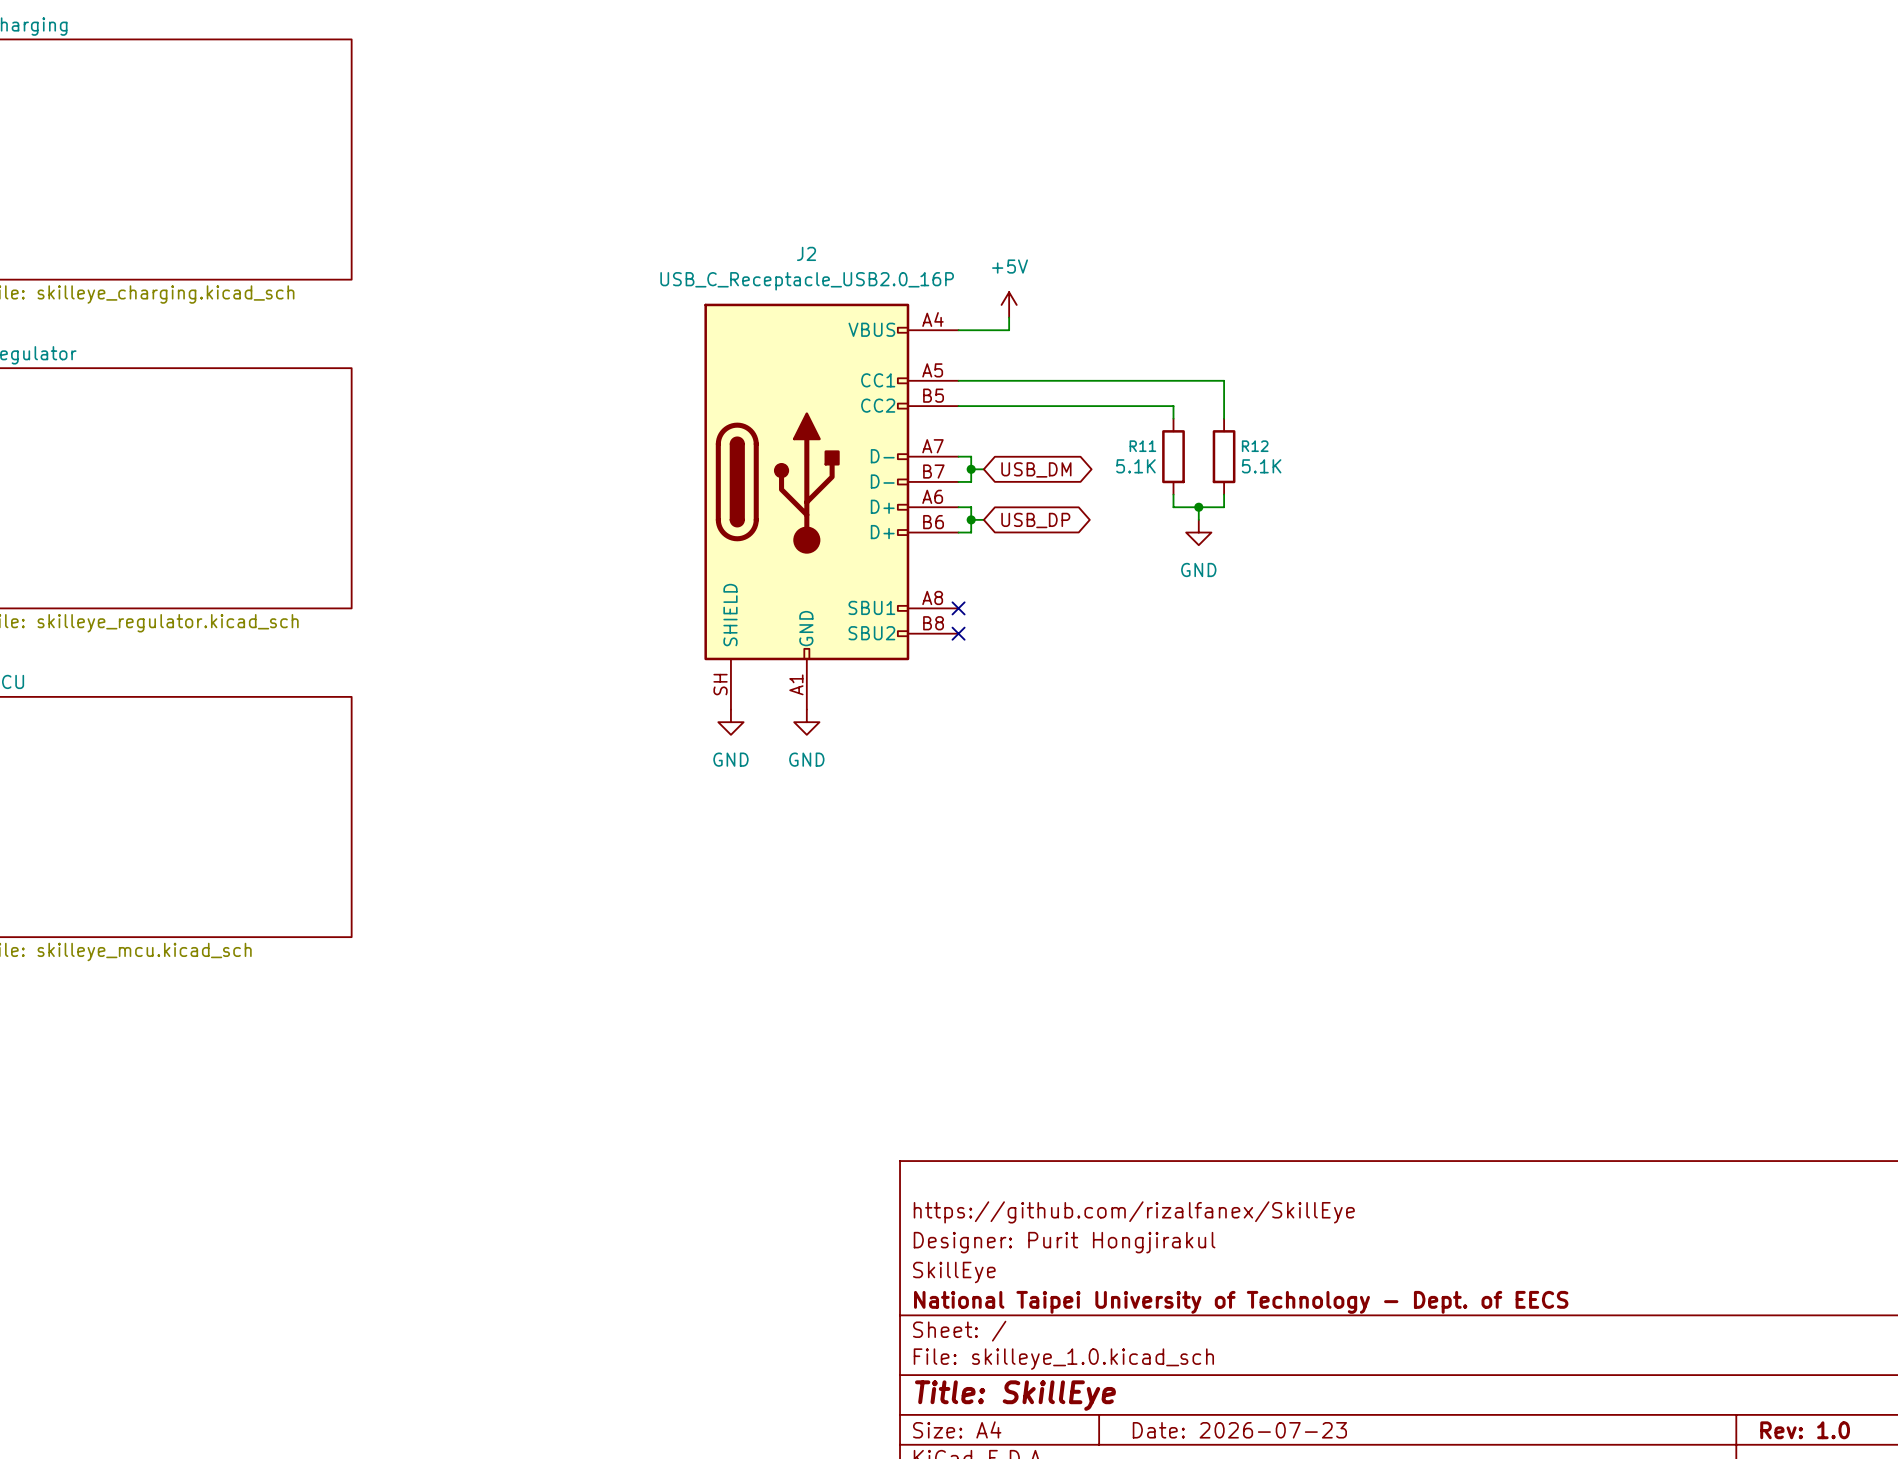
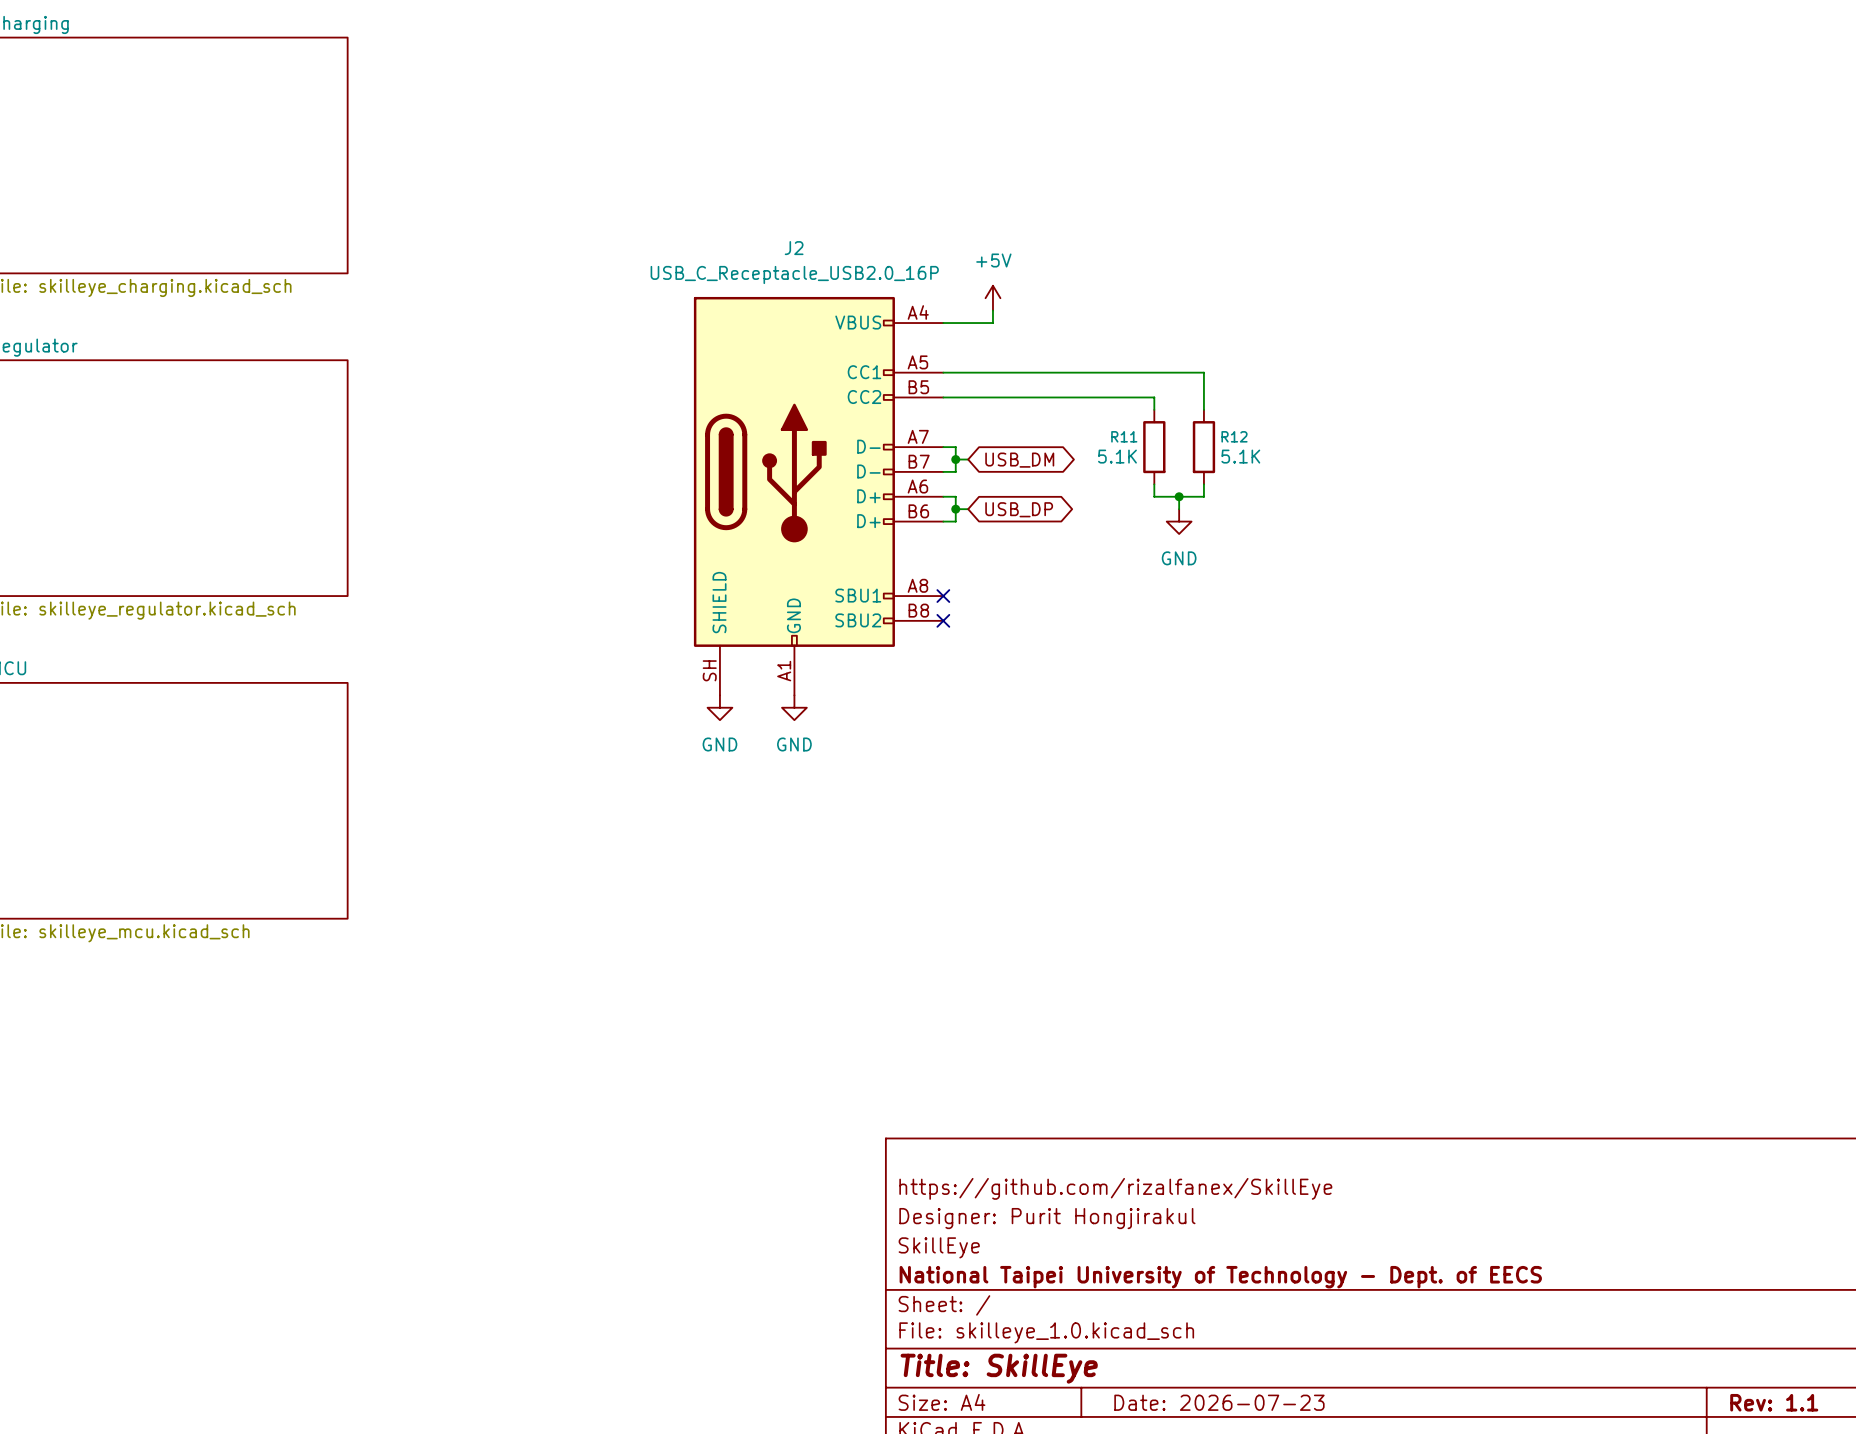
title block: Rev: 1.0 (1805, 1430) -> Rev: 1.1 (1774, 1402)

